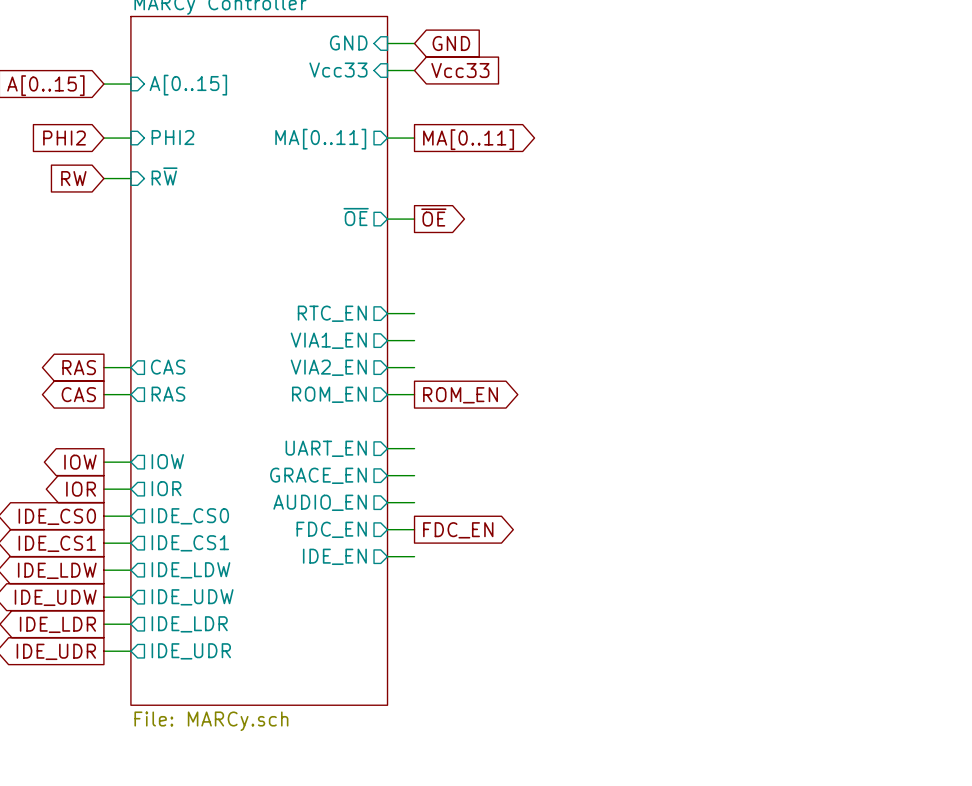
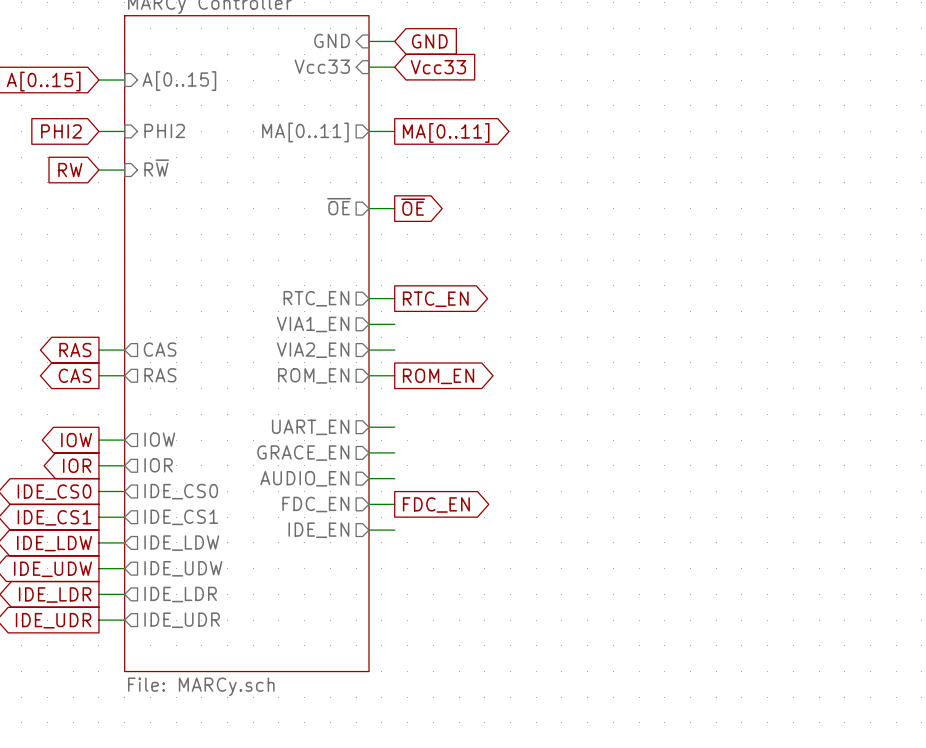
global label: none -> RTC_EN (435, 299)

